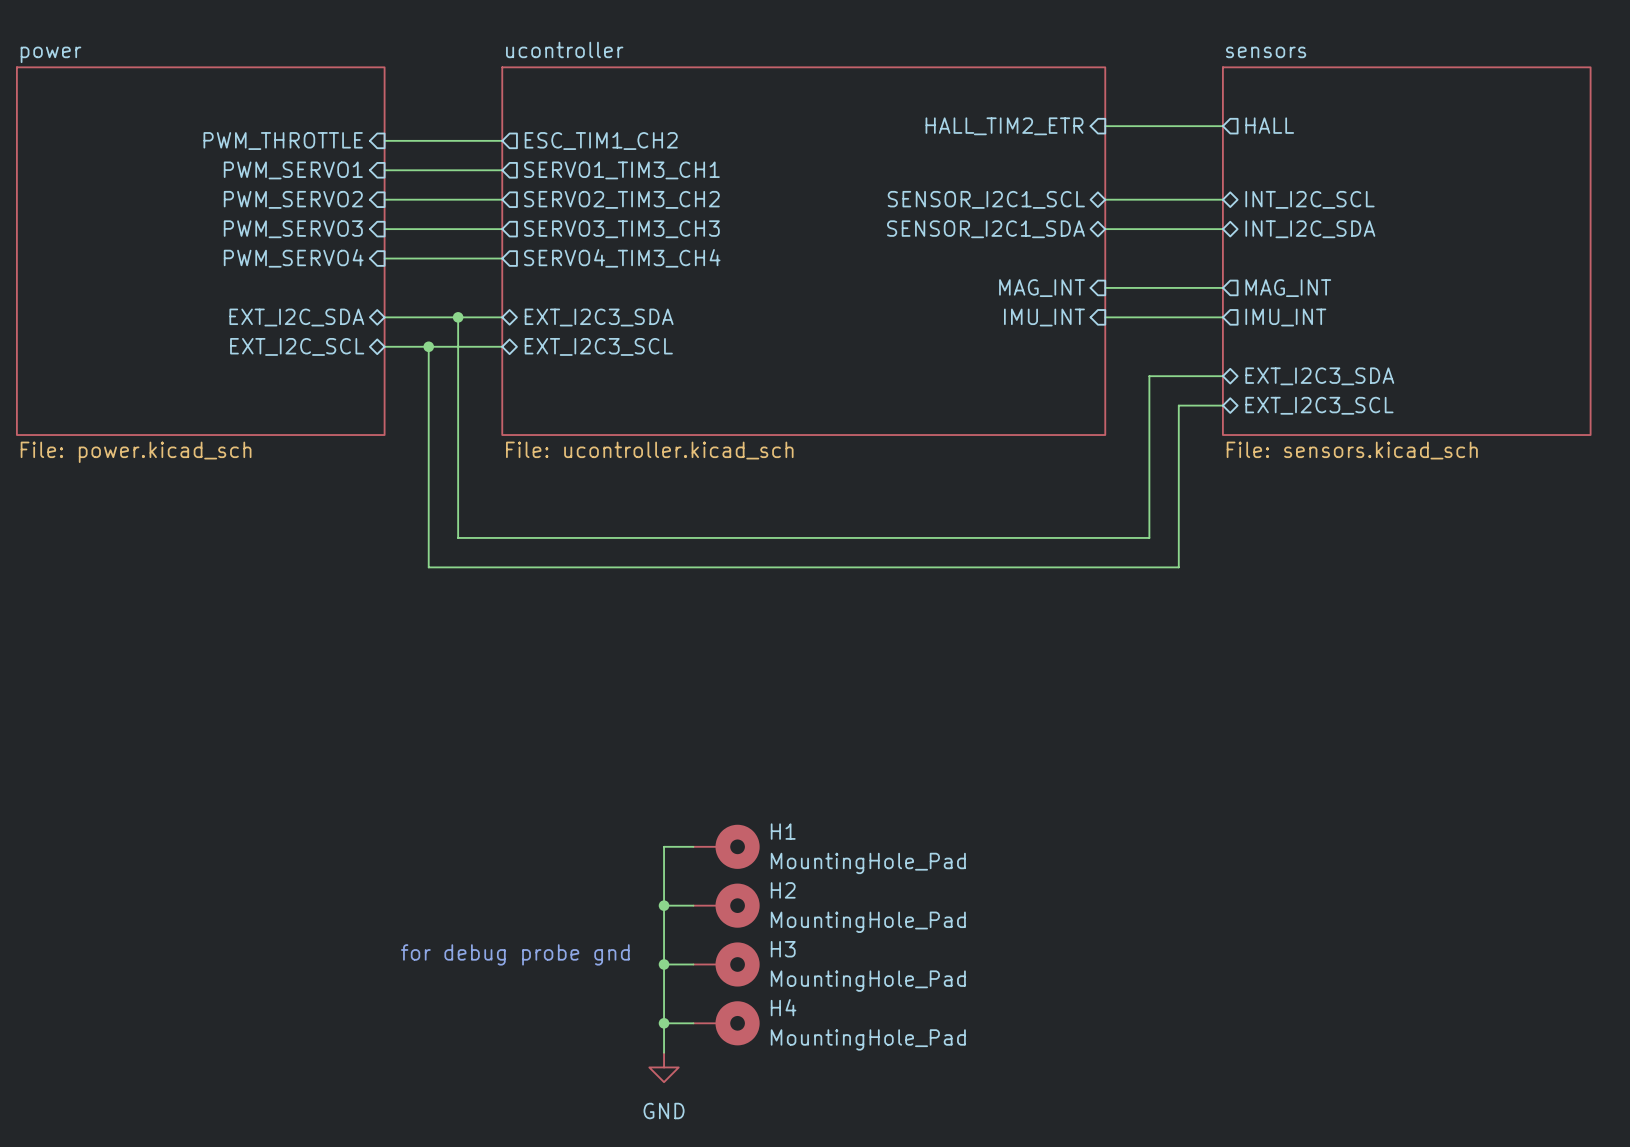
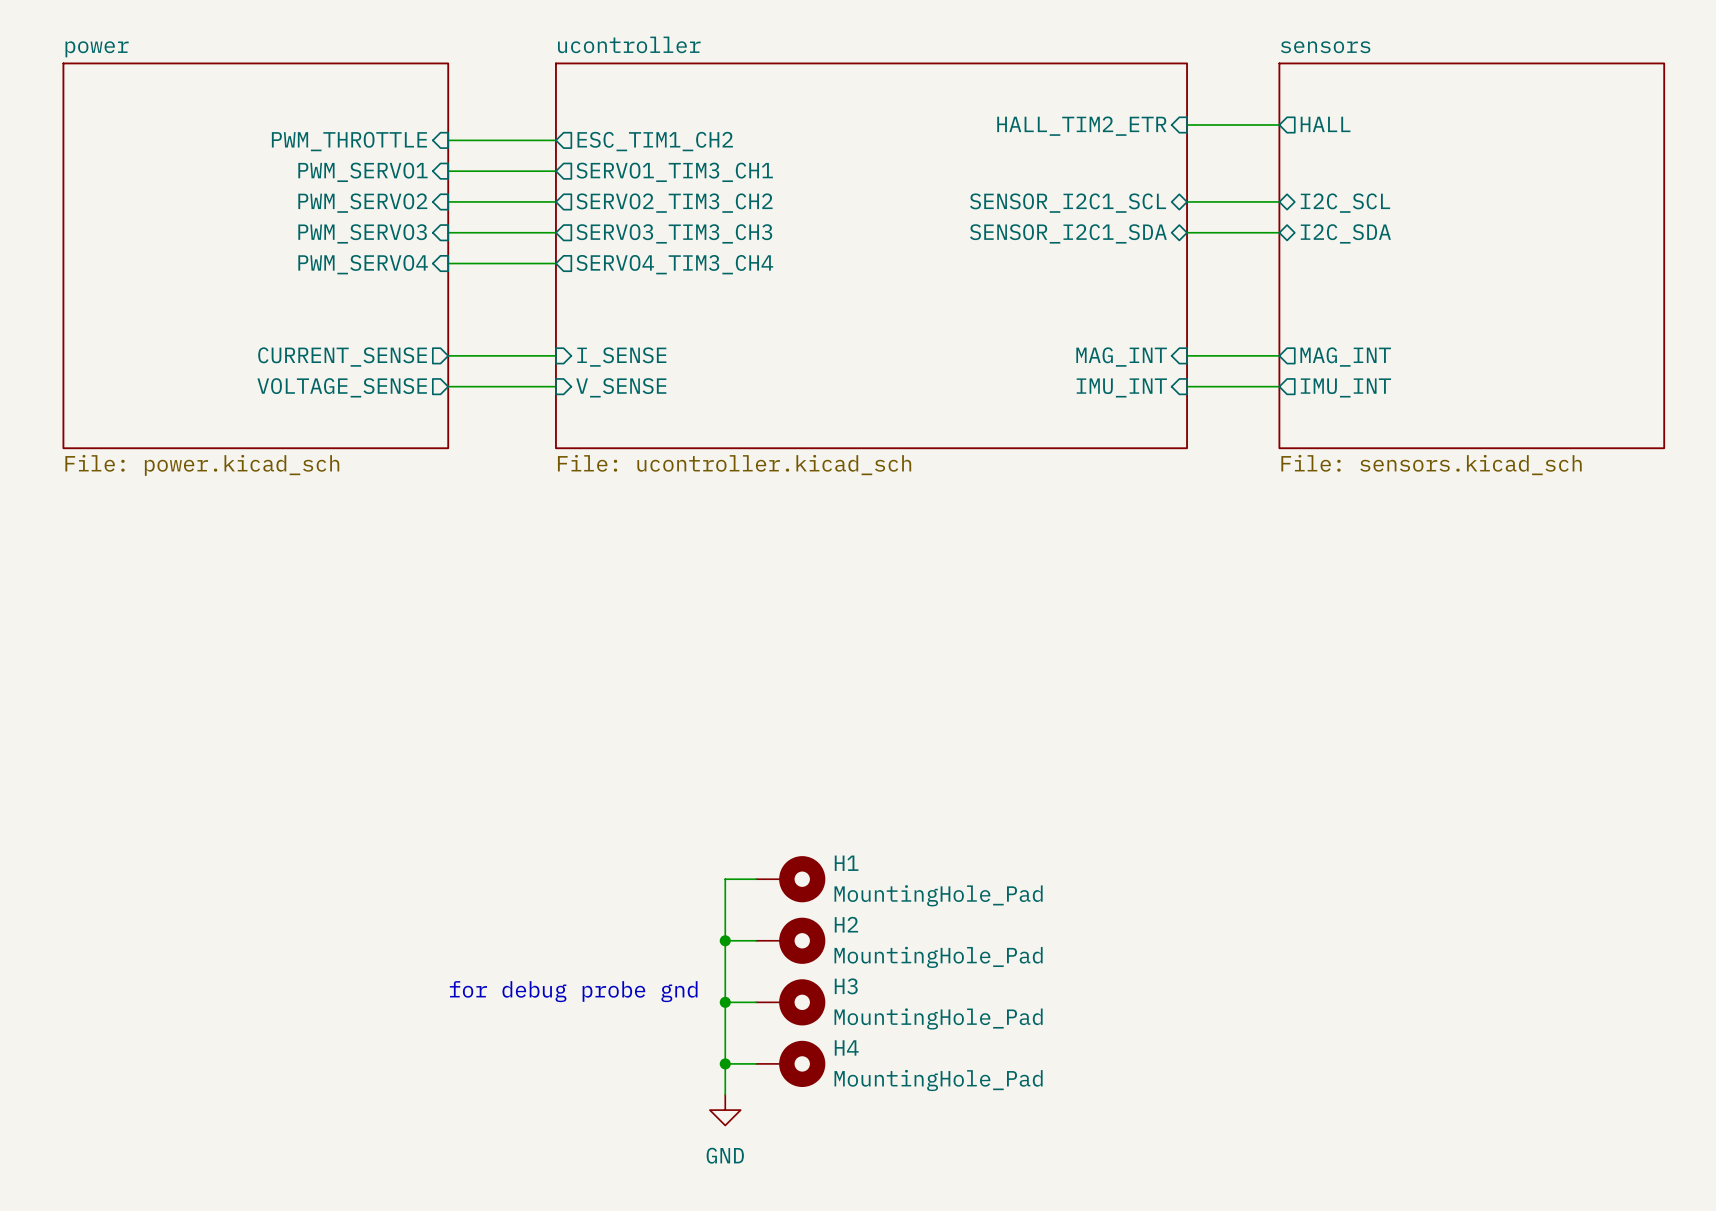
sheet pin position: HALL (1269, 125) -> HALL (1325, 124)
wire: (1193, 126) (1222, 126) -> none
wire: (384, 140) (399, 140) -> none
sheet pin position: PWM_THROTTLE (283, 141) -> PWM_THROTTLE (349, 141)
sheet pin position: PWM_SERVO1 (293, 170) -> PWM_SERVO1 (362, 172)
wire: (384, 170) (399, 170) -> none
sheet pin position: PWM_SERVO2 (293, 199) -> PWM_SERVO2 (362, 203)
wire: (384, 199) (399, 199) -> none
wire: (1193, 199) (1222, 199) -> none
sheet pin: INT_I2C_SCL (1309, 199) -> I2C_SCL (1345, 203)
sheet pin position: PWM_SERVO3 (293, 229) -> PWM_SERVO3 (362, 233)
wire: (384, 229) (399, 229) -> none
wire: (1193, 229) (1222, 229) -> none
sheet pin: INT_I2C_SDA (1310, 229) -> I2C_SDA (1345, 233)
sheet power position: (200, 251) -> (255, 255)
sheet sensors position: (1406, 251) -> (1471, 255)
sheet pin position: PWM_SERVO4 (293, 258) -> PWM_SERVO4 (363, 264)
wire: (384, 258) (399, 258) -> none
wire: (1105, 287) (1222, 287) -> none
sheet pin position: MAG_INT (1041, 288) -> MAG_INT (1121, 357)
sheet pin position: MAG_INT (1288, 288) -> MAG_INT (1345, 357)
sheet pin: EXT_I2C_SDA (296, 317) -> none
wire: (384, 317) (502, 317) -> none
wire: (458, 317) (458, 537) (1149, 537) (1149, 376) -> (1187, 386) (1233, 386)
junction: (458, 317) -> none
sheet pin: EXT_I2C3_SDA (599, 317) -> none
sheet pin position: IMU_INT (1044, 317) -> IMU_INT (1121, 387)
wire: (1105, 317) (1222, 317) -> none
sheet pin position: IMU_INT (1285, 317) -> IMU_INT (1345, 387)
sheet pin: none -> CURRENT_SENSE (342, 357)
sheet pin: EXT_I2C_SCL (297, 346) -> none
wire: (384, 346) (399, 346) -> none
wire: (428, 346) (428, 567) (1178, 567) (1178, 405) (1222, 405) -> none
junction: (428, 346) -> none
sheet pin shape: bidirectional (598, 346) -> input (621, 357)
sheet pin: EXT_I2C3_SCL (598, 346) -> I_SENSE (621, 357)
wire: none -> (1187, 355) (1279, 355)
sheet pin: none -> VOLTAGE_SENSE (342, 387)
wire: none -> (448, 386) (555, 386)
sheet pin: none -> V_SENSE (621, 387)
wire: (1193, 376) (1222, 376) -> none
sheet pin: EXT_I2C3_SDA (1319, 376) -> none
sheet pin: EXT_I2C3_SCL (1319, 405) -> none

